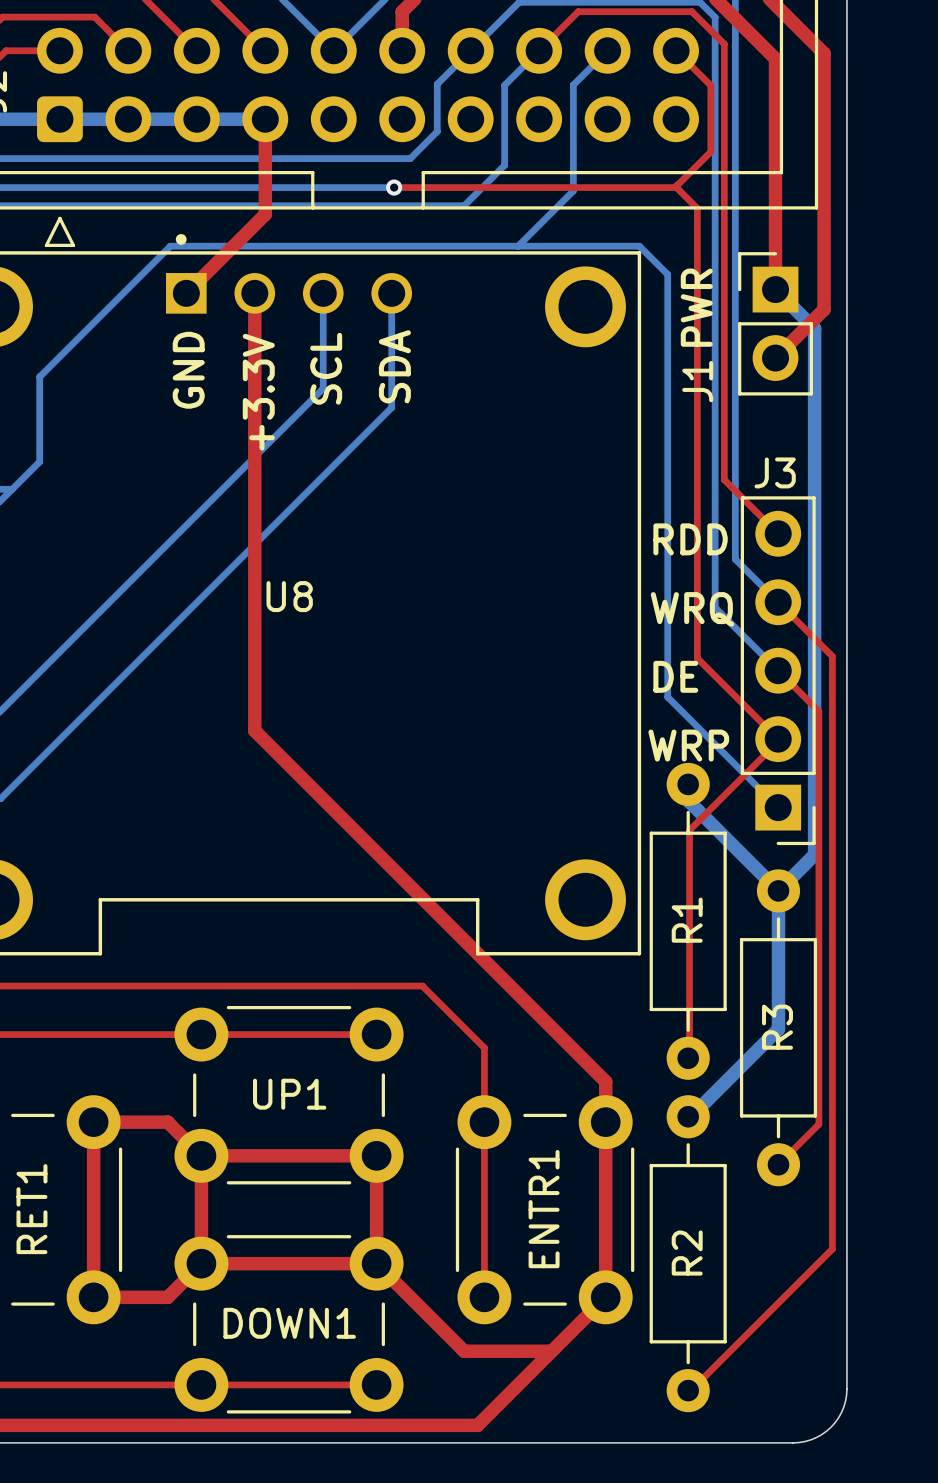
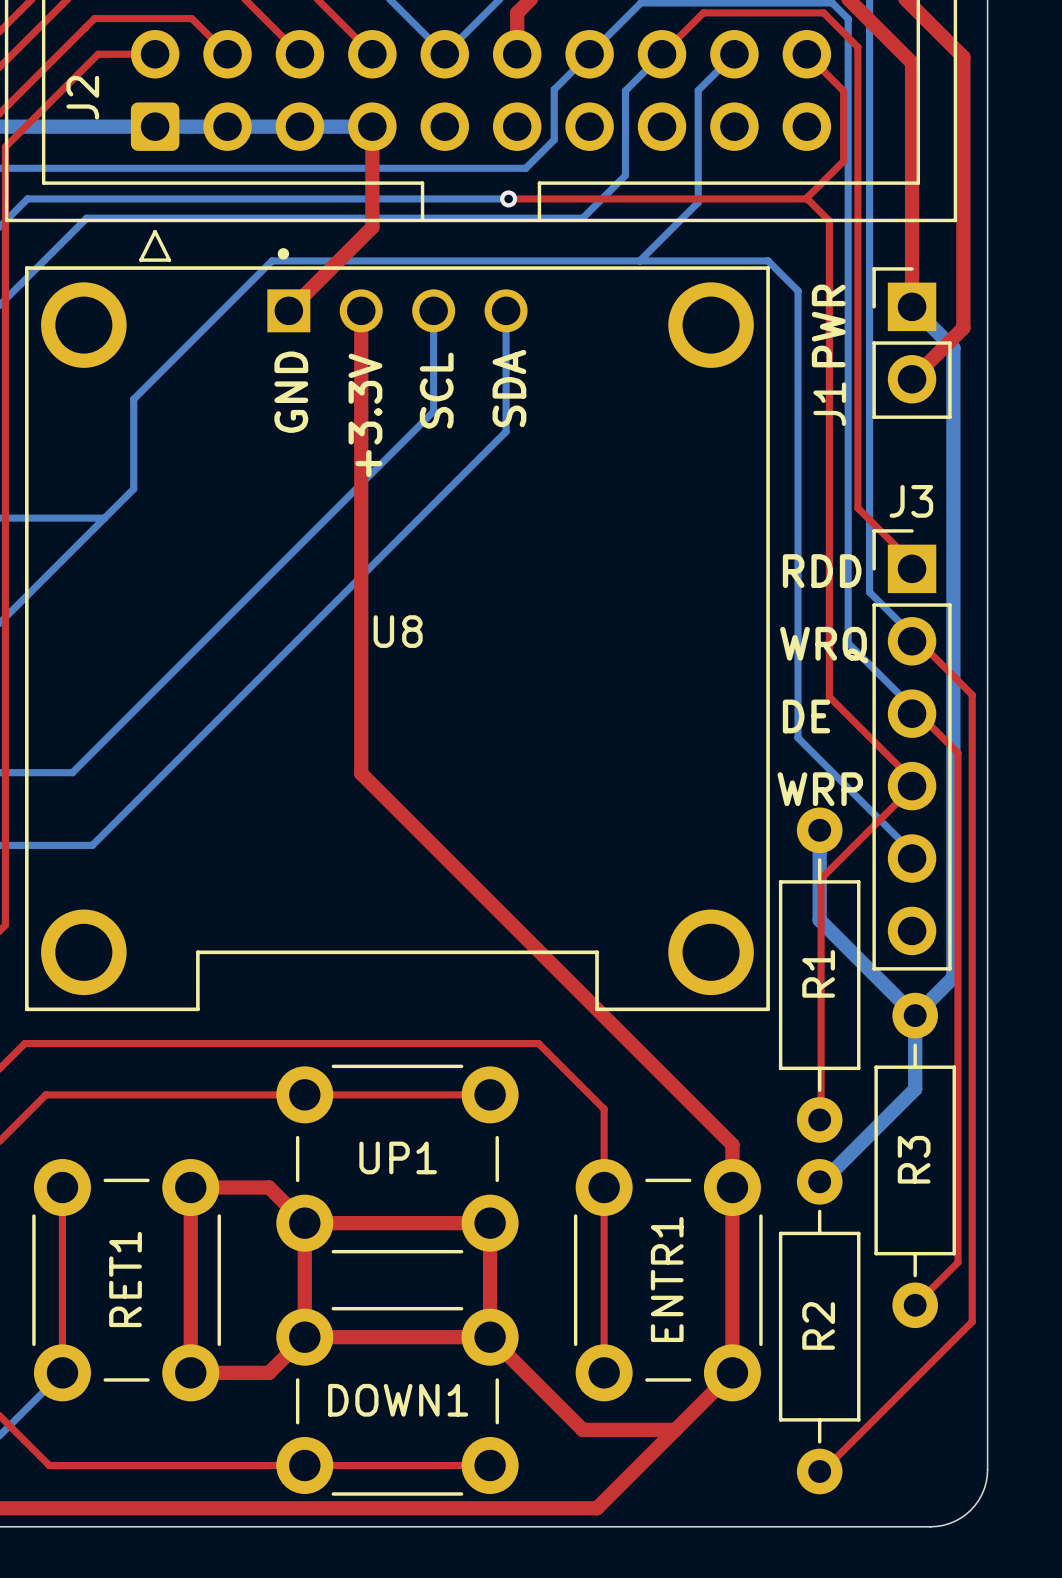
J3 footprint: [740, 496, 816, 846] -> [872, 529, 952, 971]
bottom track: (689, 801) (778, 890) -> none
bottom track: (814, 854) (778, 890) -> (953, 904) (953, 977) (915, 1015) (819, 920) (819, 830)
bottom track: (778, 890) (778, 959) -> none
R3 position: (778, 1027) -> (915, 1160)
top track: (818, 1124) (778, 1164) -> (957, 1189) (957, 1262) (915, 1305)

